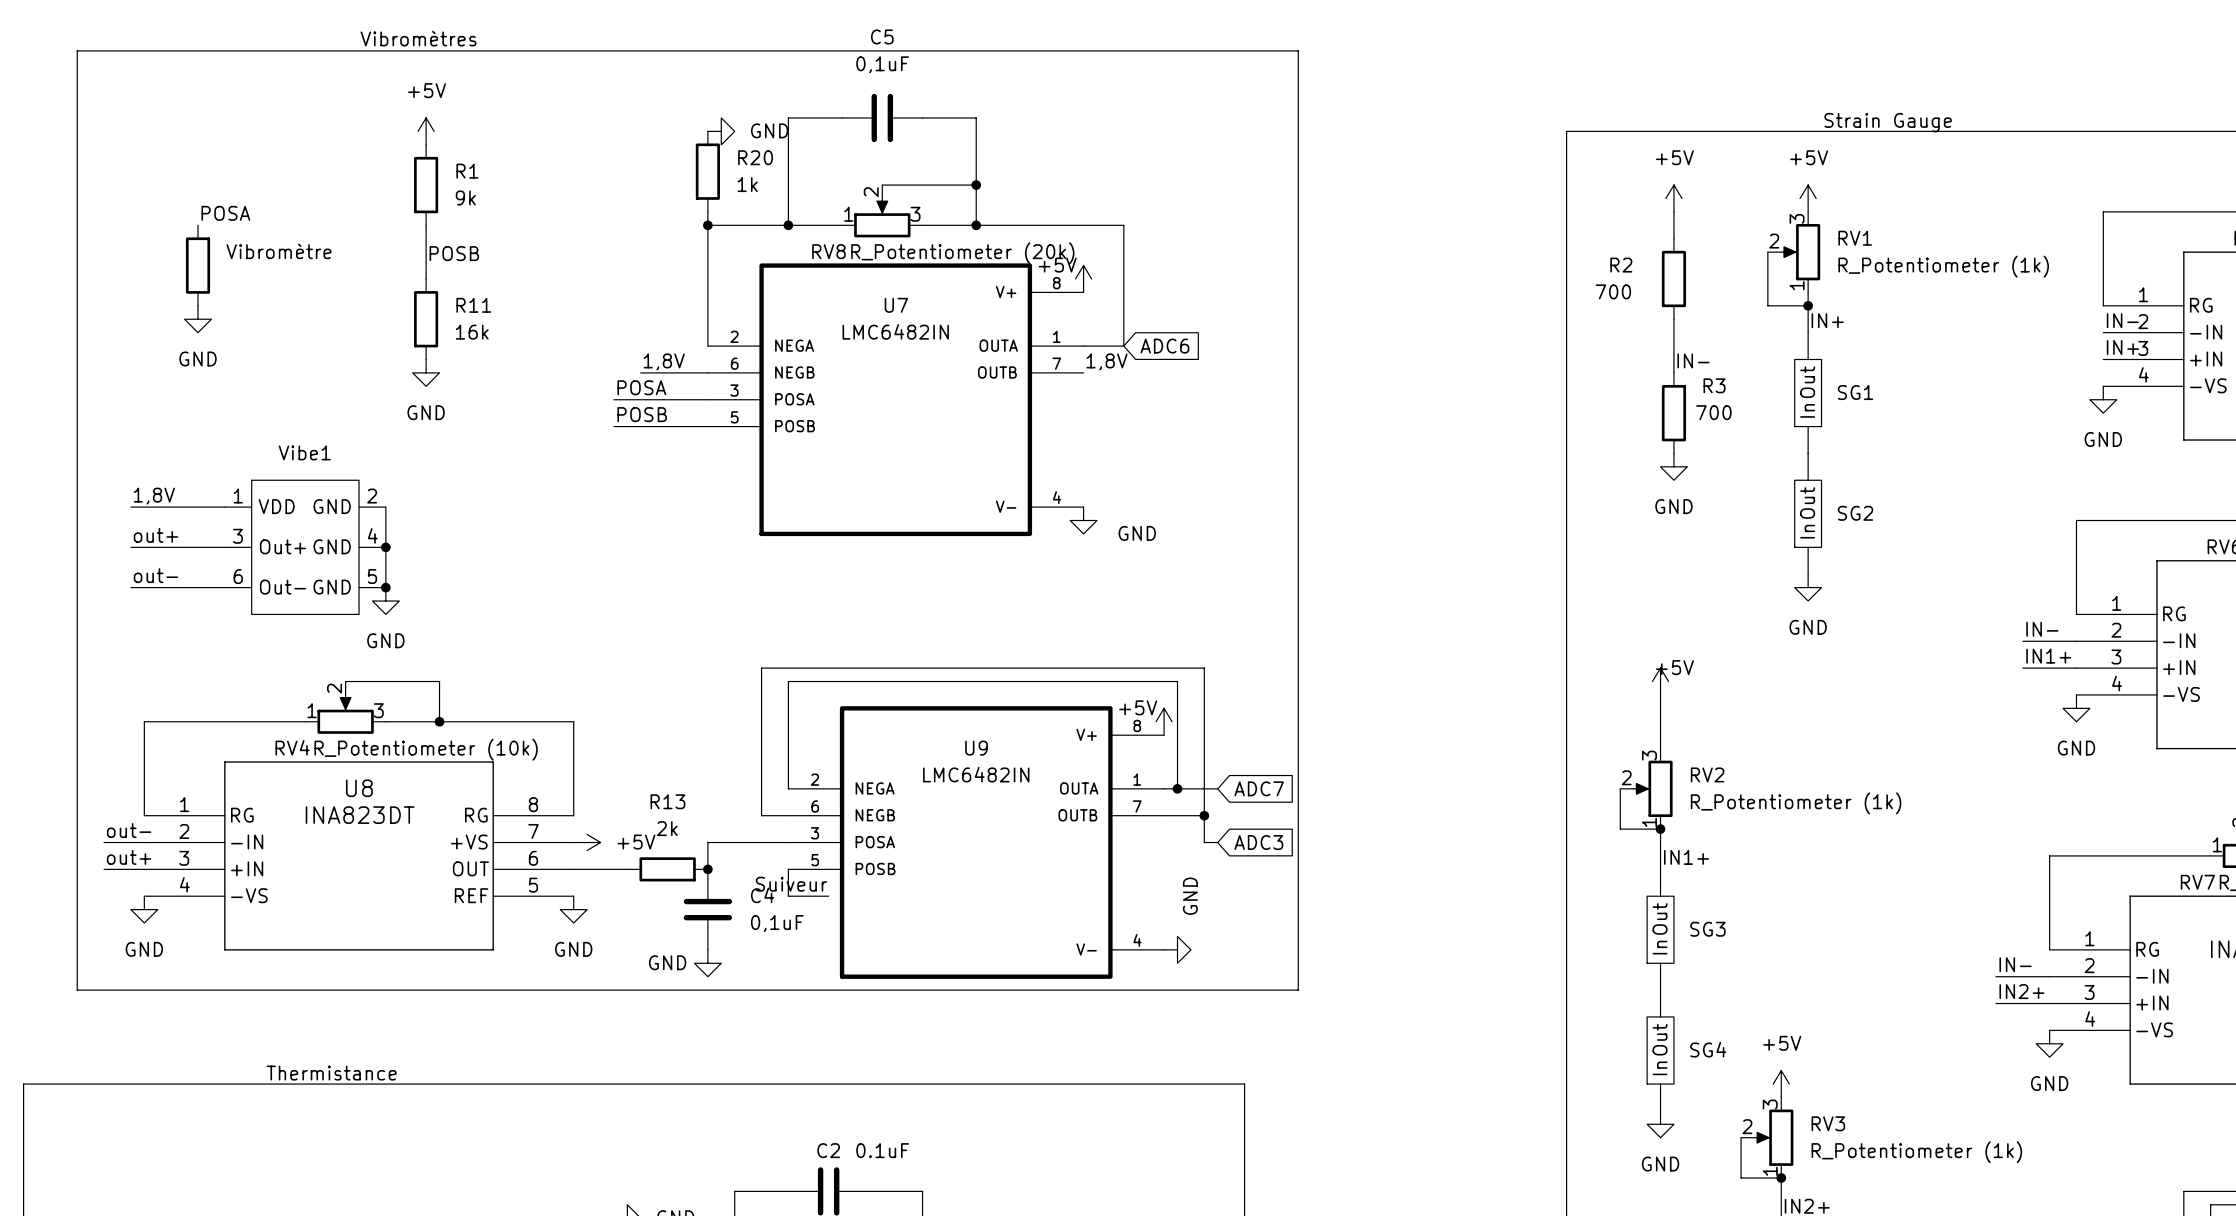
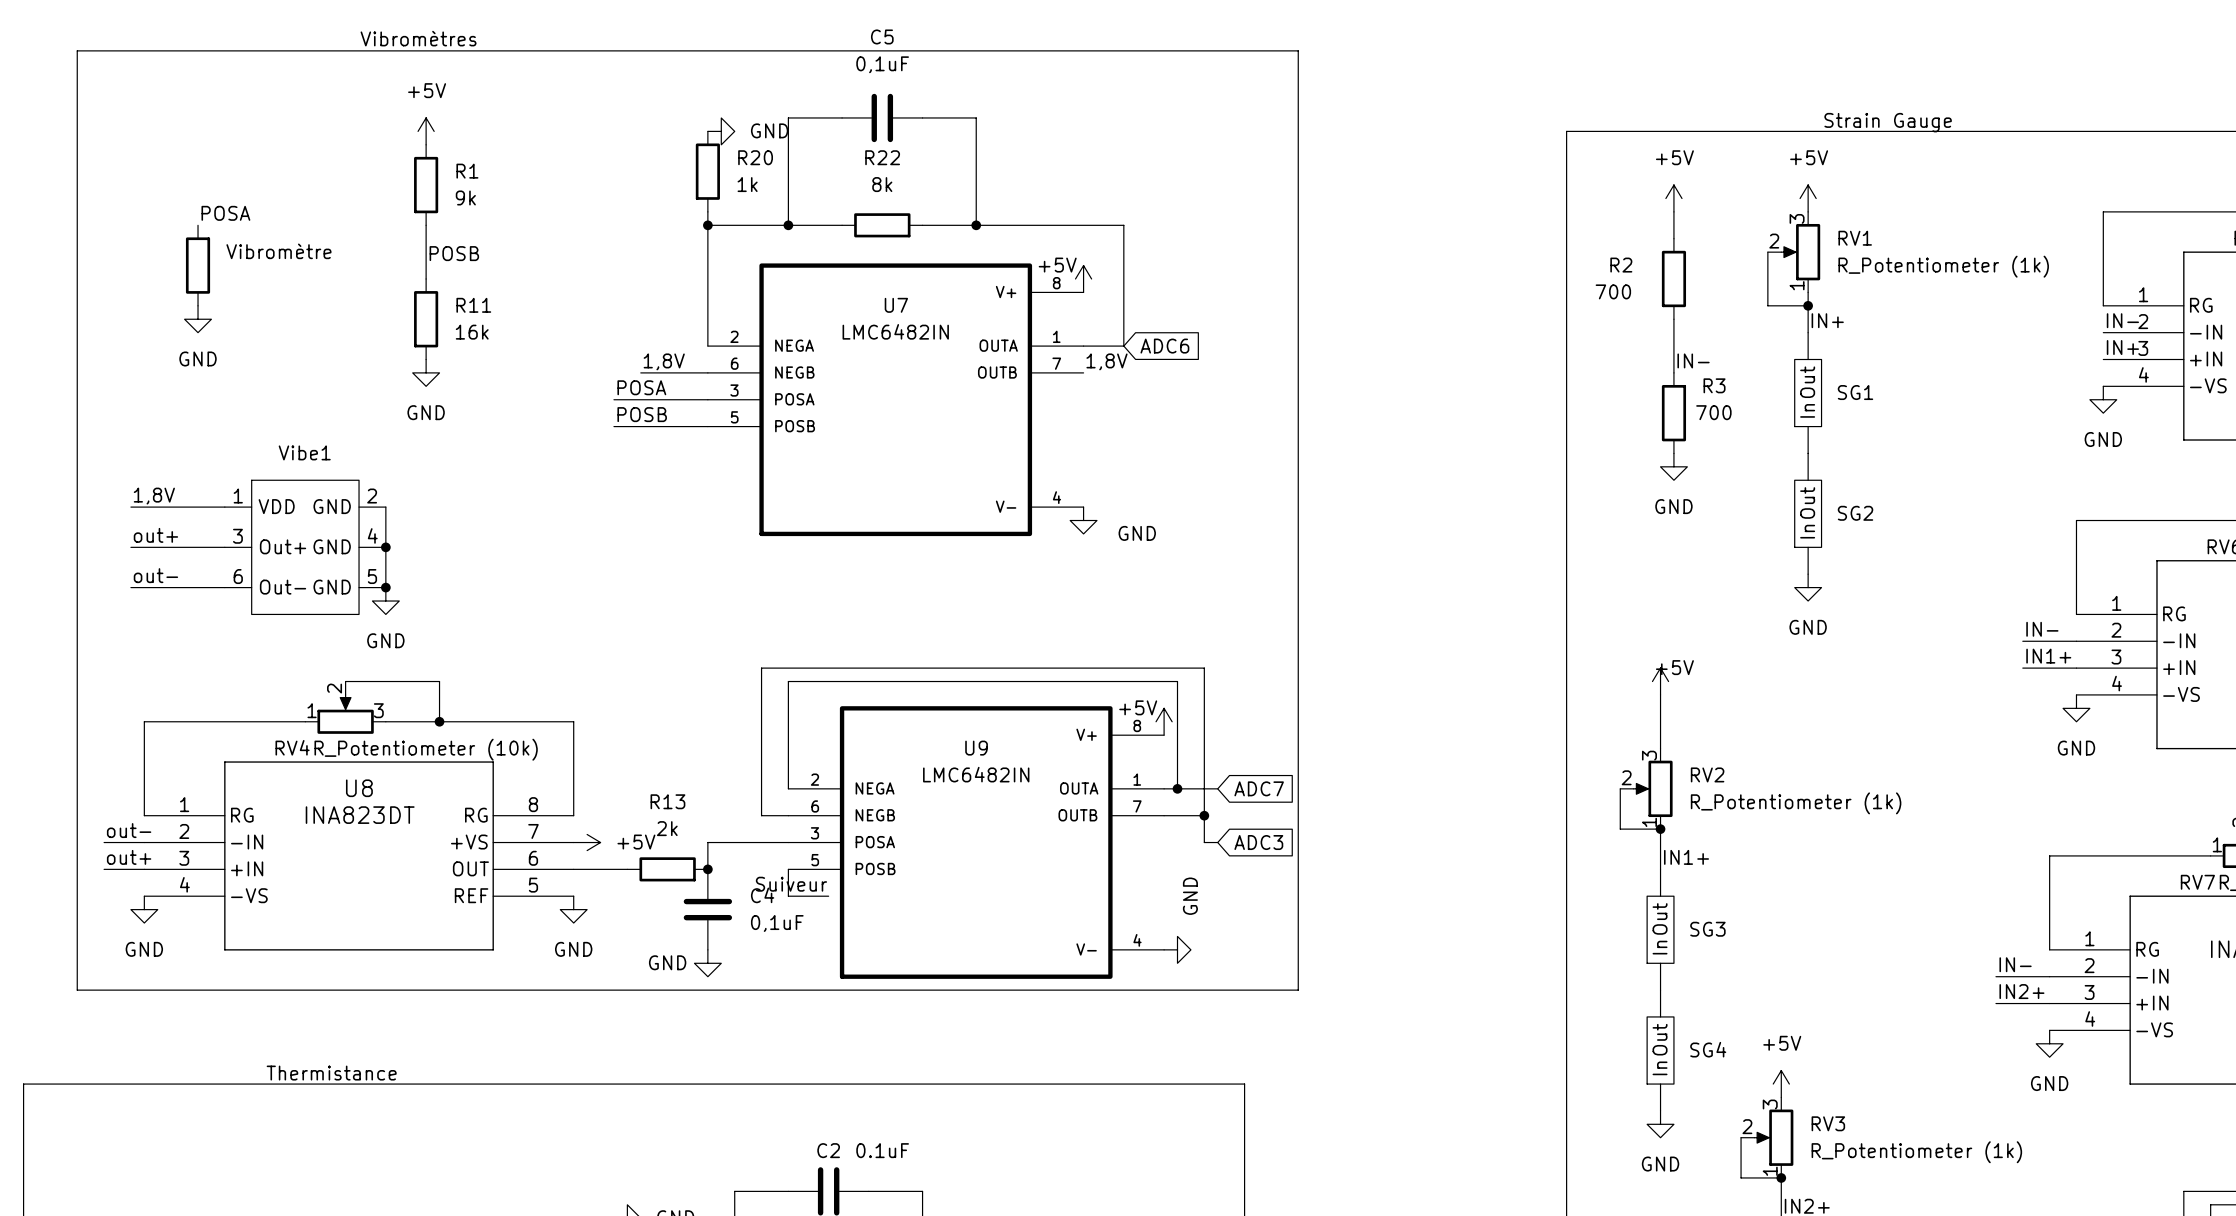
wire: (882, 185) (976, 185) -> none
junction: (976, 185) -> none
RV8: R_Potentiometer (20k) (882, 211) -> none
R22: none -> 8k (882, 225)

